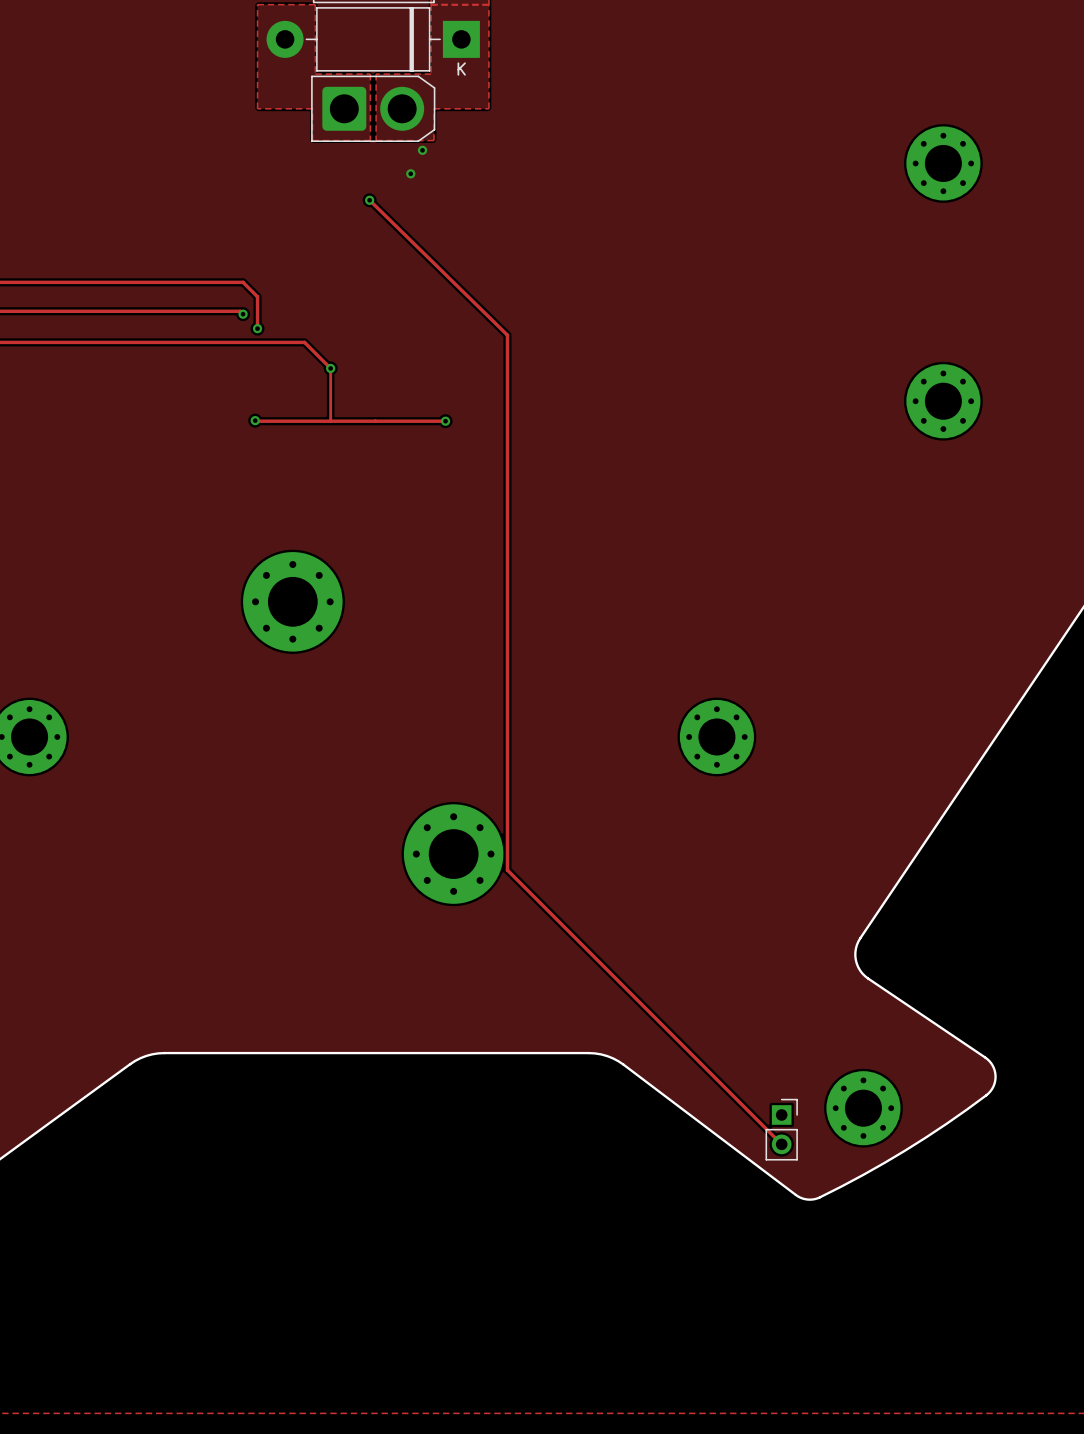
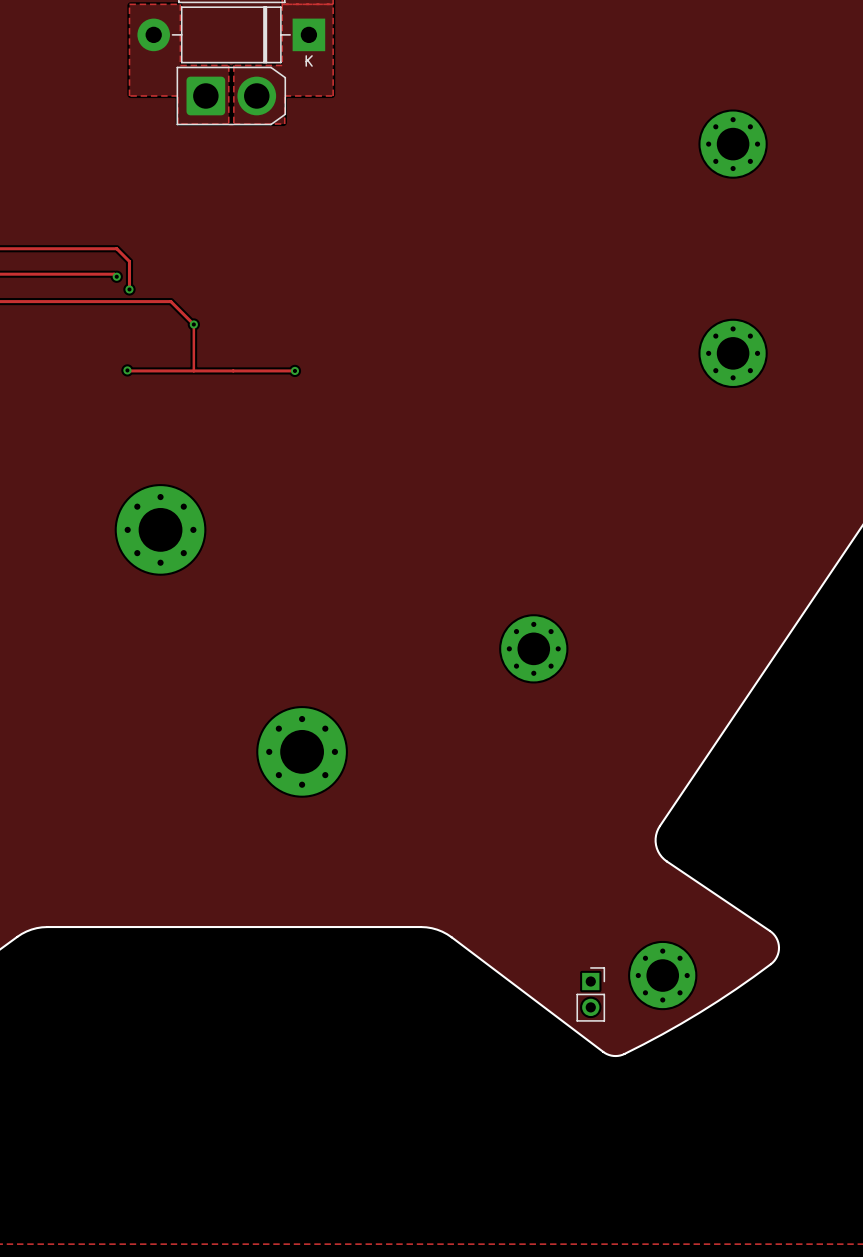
via: (422, 150) -> none
via: (410, 173) -> none
track: (369, 200) (507, 335) (507, 870) (781, 1144) -> none
via: (369, 200) -> none

